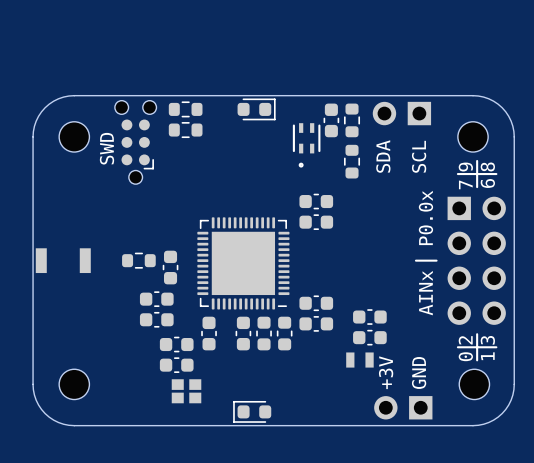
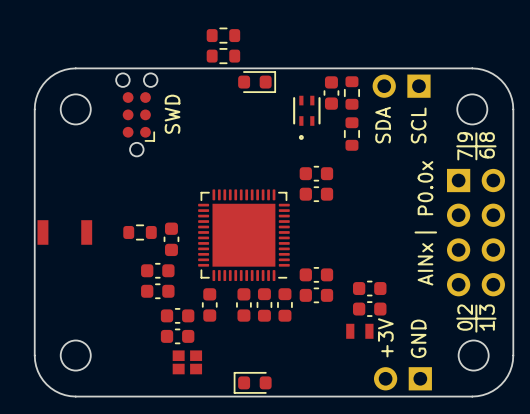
part: none -> (223, 35)
part: none -> (223, 56)
part: (185, 109) -> none
part: (185, 130) -> none
text position: SWD (106, 148) -> SWD (172, 114)

